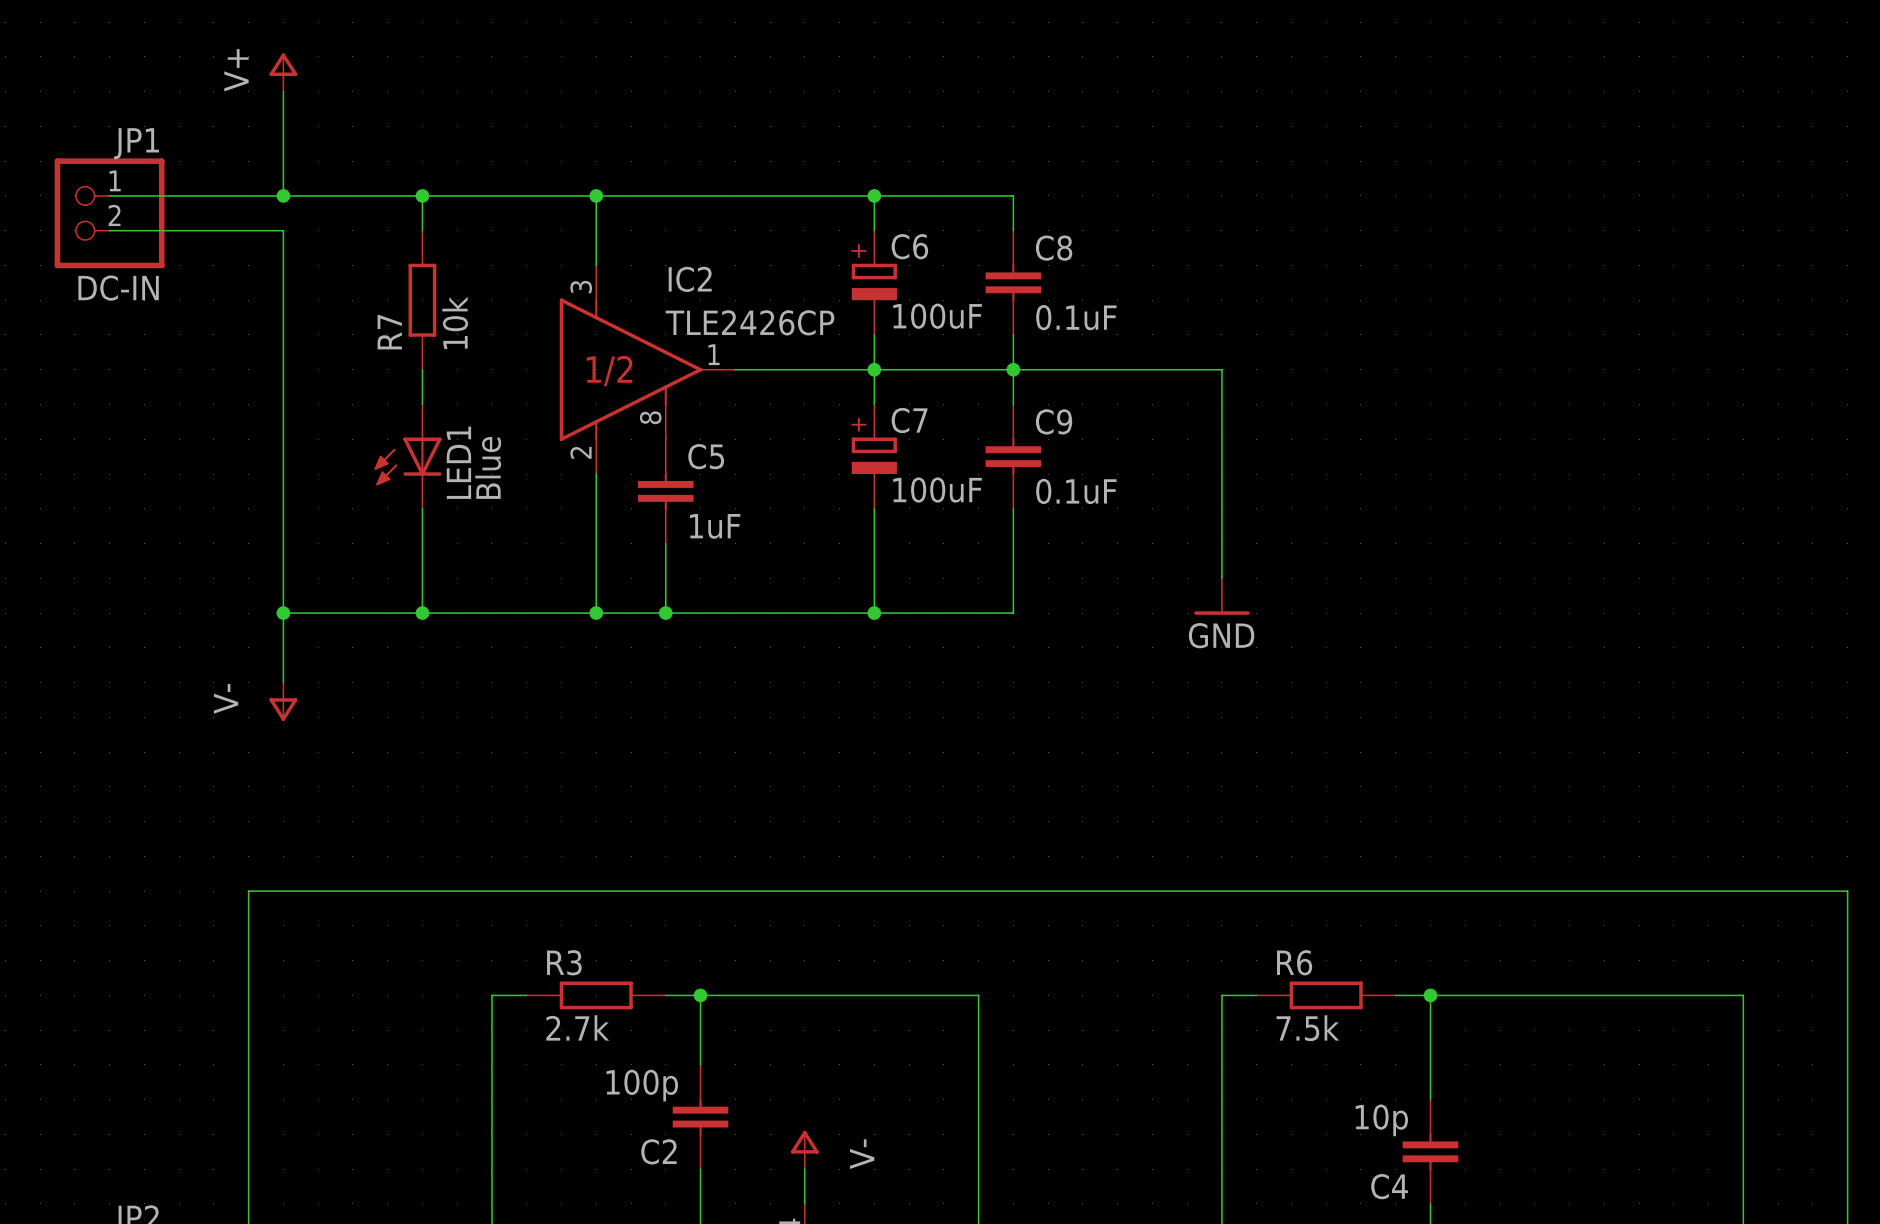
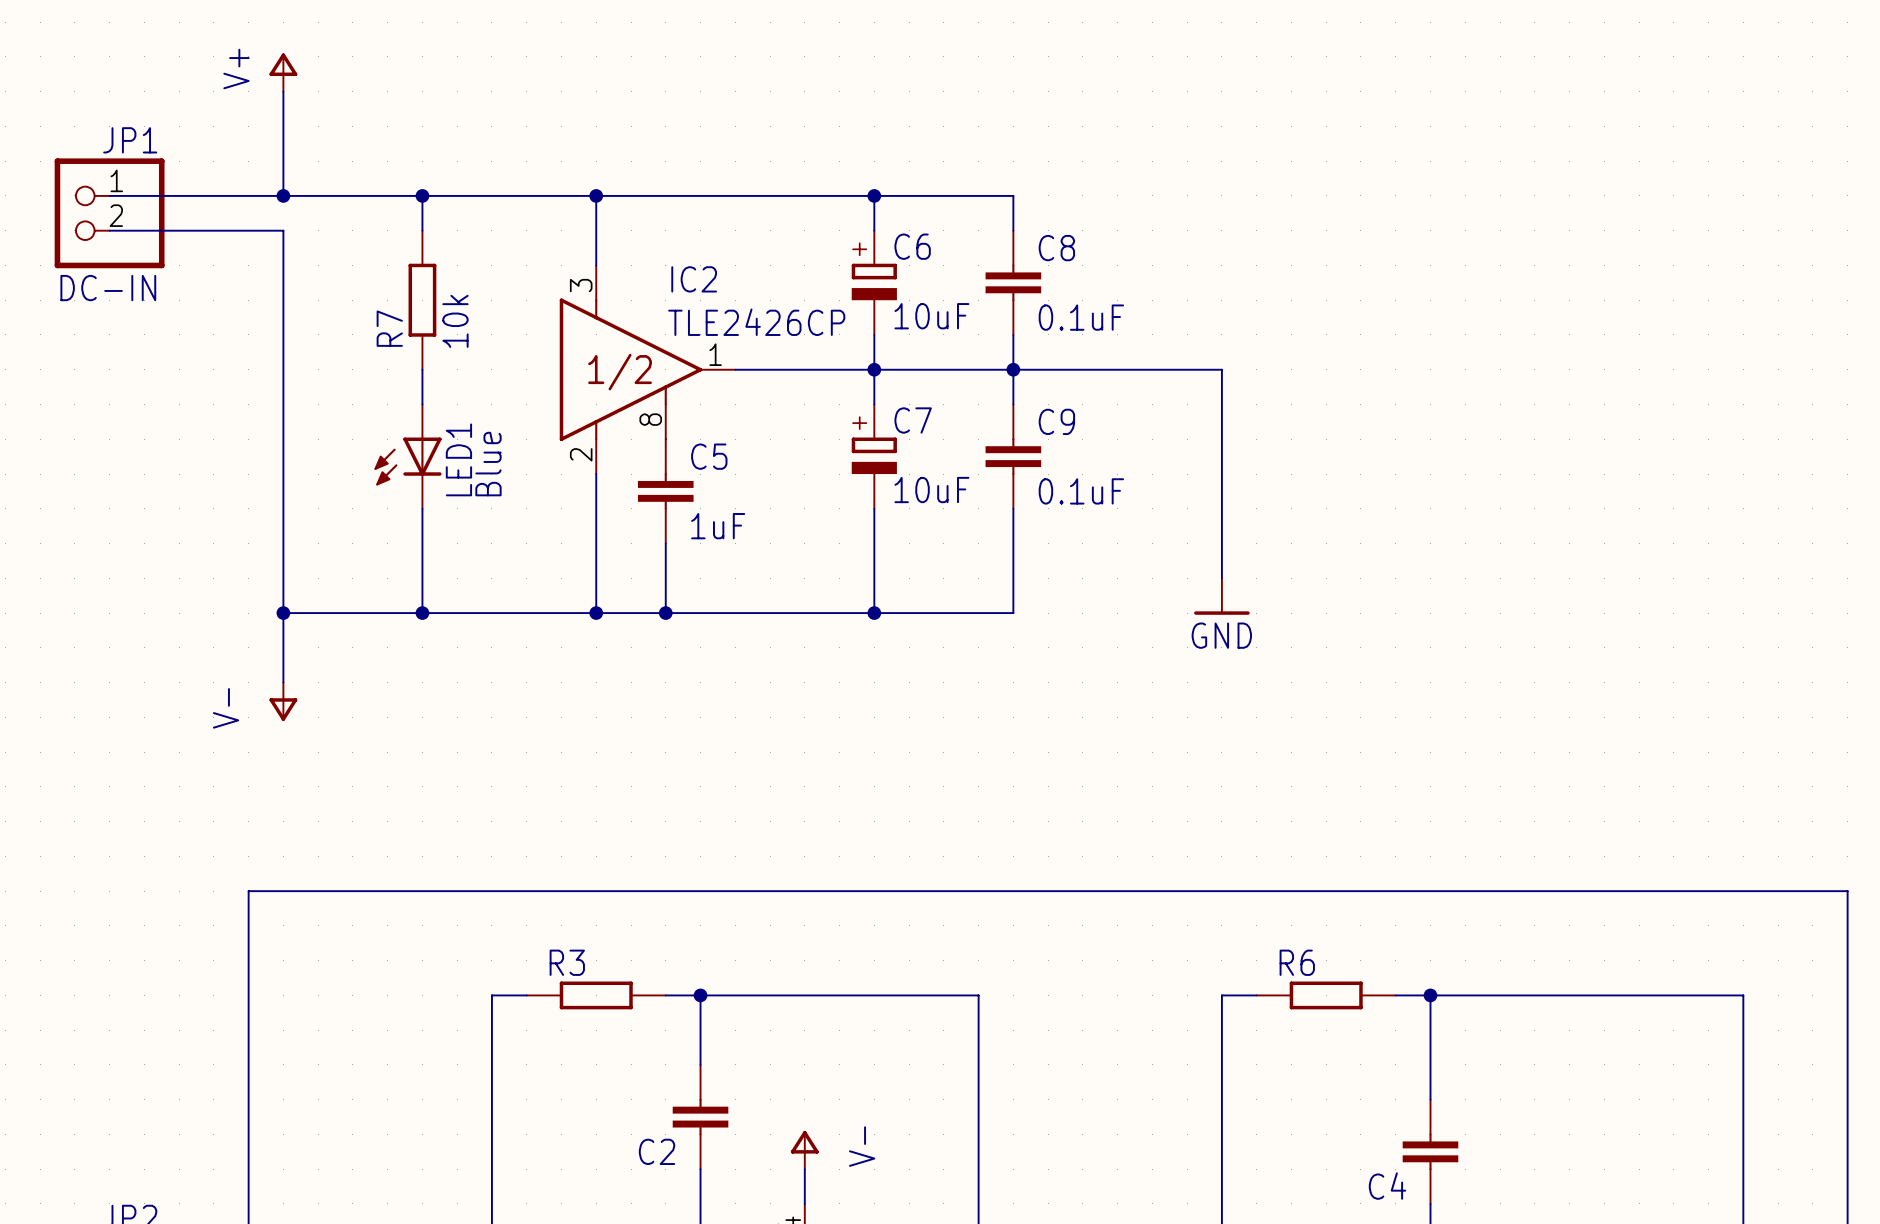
C6 value: 100uF (937, 316) -> 10uF (931, 316)
C7 value: 100uF (937, 490) -> 10uF (931, 490)
R3 value: 2.7k (577, 1027) -> none
R6 value: 7.5k (1307, 1028) -> none
C2 value: 100p (642, 1085) -> none
C4 value: 10p (1381, 1120) -> none

